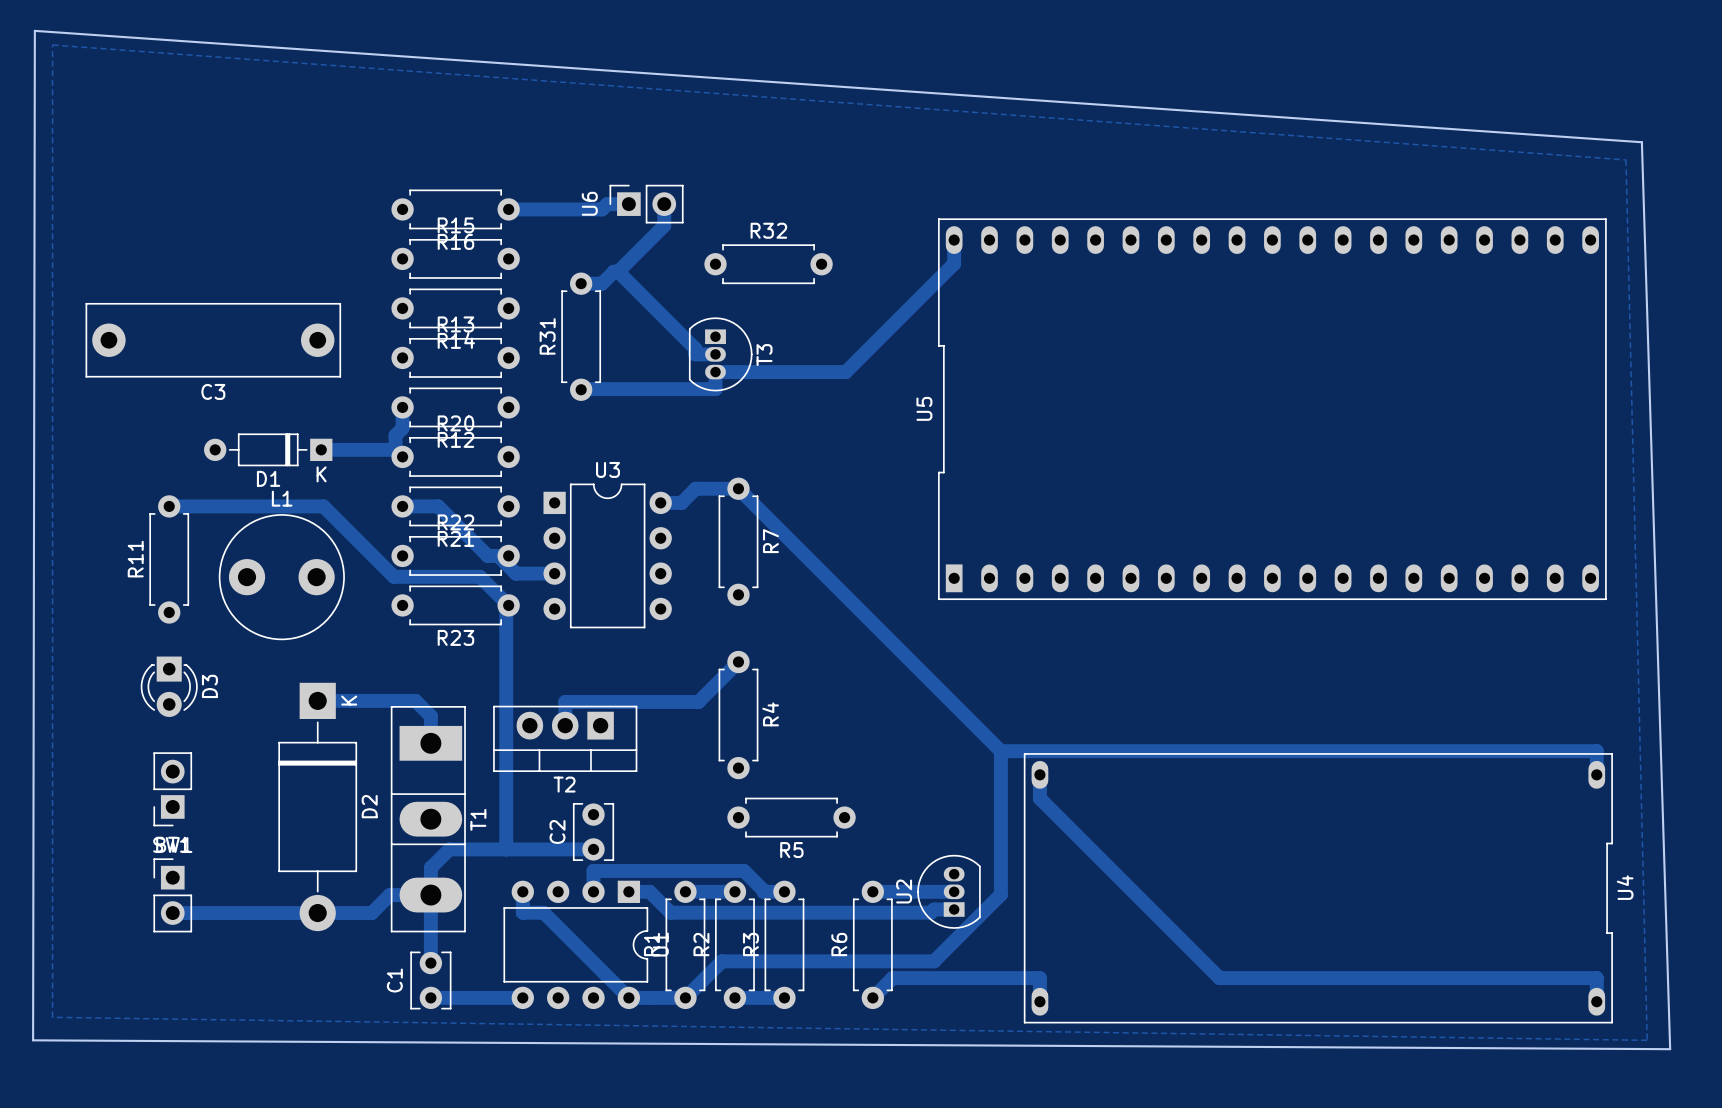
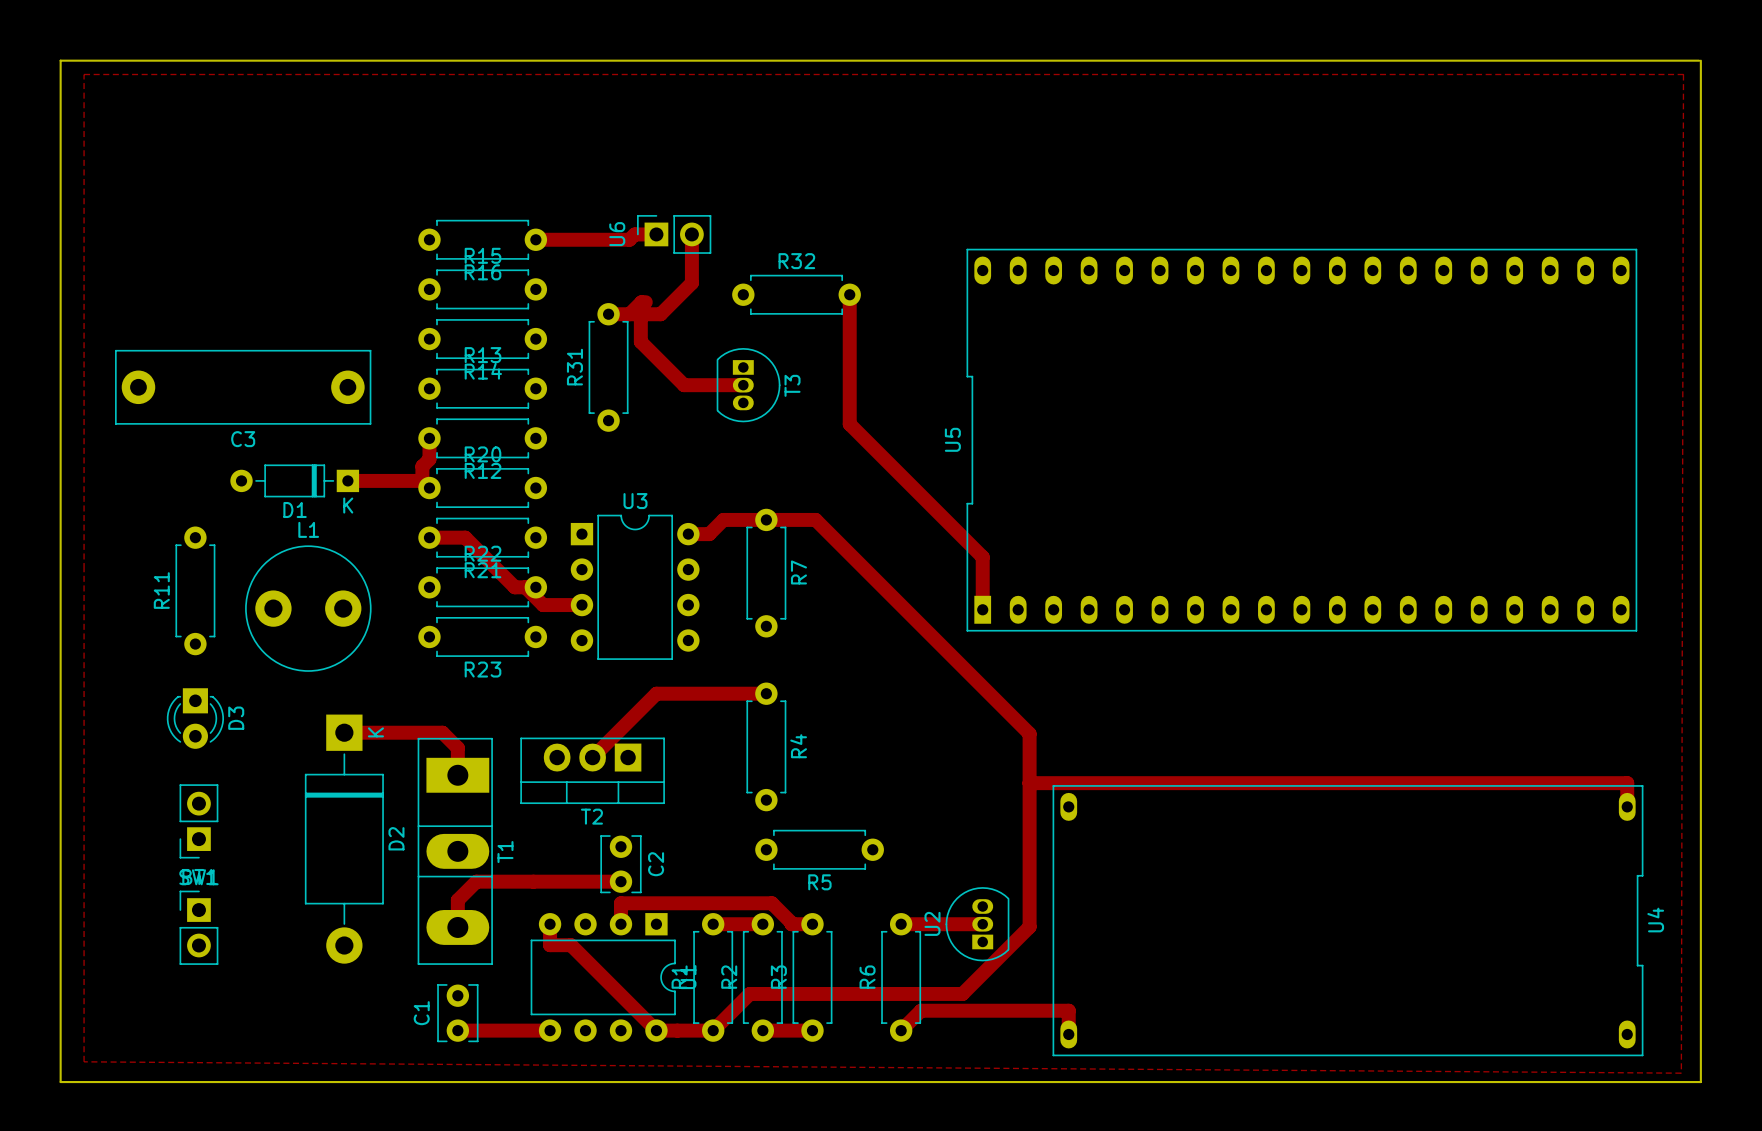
board edge: (34, 30) (33, 1040) (1670, 1049) (1641, 142) (34, 30) -> none
board edge: none -> (1699, 60) (60, 60) (60, 1082) (1700, 1082) (1700, 60)
zone outline: (52, 45) (52, 1017) (1647, 1040) (1625, 159) (52, 45) -> (84, 74) (84, 1061) (1681, 1073) (1683, 74) (84, 74)
track: (664, 225) (618, 271) (695, 348) (695, 354) -> (640, 314) (640, 341) (684, 385) (723, 385)
track: none -> (691, 256) (691, 283) (660, 314) (629, 314)
track: (954, 240) (954, 263) (845, 372) (715, 372) (715, 389) (581, 389) -> none
track: none -> (848, 295) (849, 294) (849, 424) (982, 557) (982, 609)
C3 position: (213, 340) -> (243, 387)
track: (738, 488) (1000, 751) -> (766, 519) (815, 519) (1029, 733) (1029, 783)
track: (169, 506) (323, 506) (393, 576) (480, 576) (508, 605) -> none
track: (506, 607) (506, 849) -> none
track: (738, 662) (698, 701) (565, 701) (565, 725) -> (766, 693) (656, 693) (592, 757)
track: (1039, 774) (1039, 798) (1219, 978) (1596, 978) (1596, 1001) -> none
C2 name position: C2 (557, 832) -> C2 (656, 864)
track: (628, 891) (649, 891) (670, 912) (930, 912) (933, 909) (954, 909) -> none
track: (172, 913) (371, 913) (389, 895) (430, 895) (430, 963) -> none

